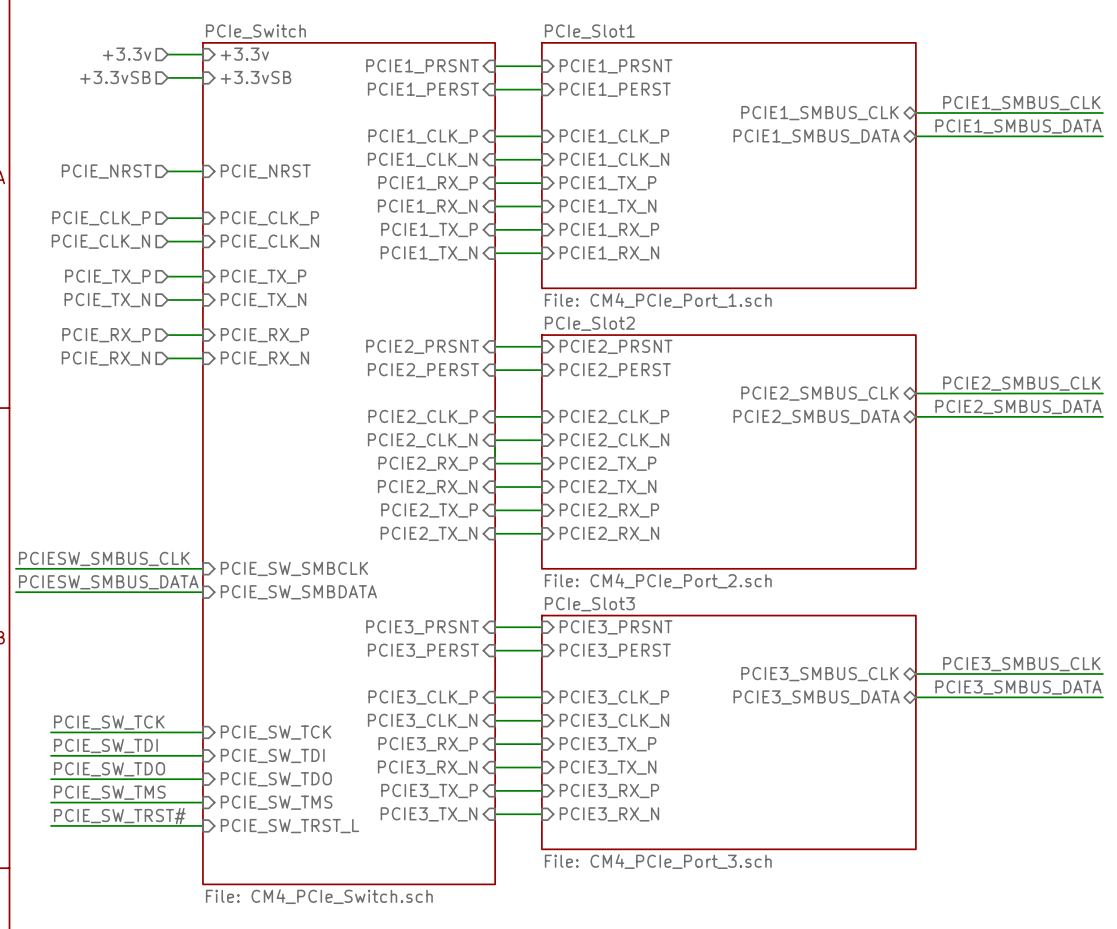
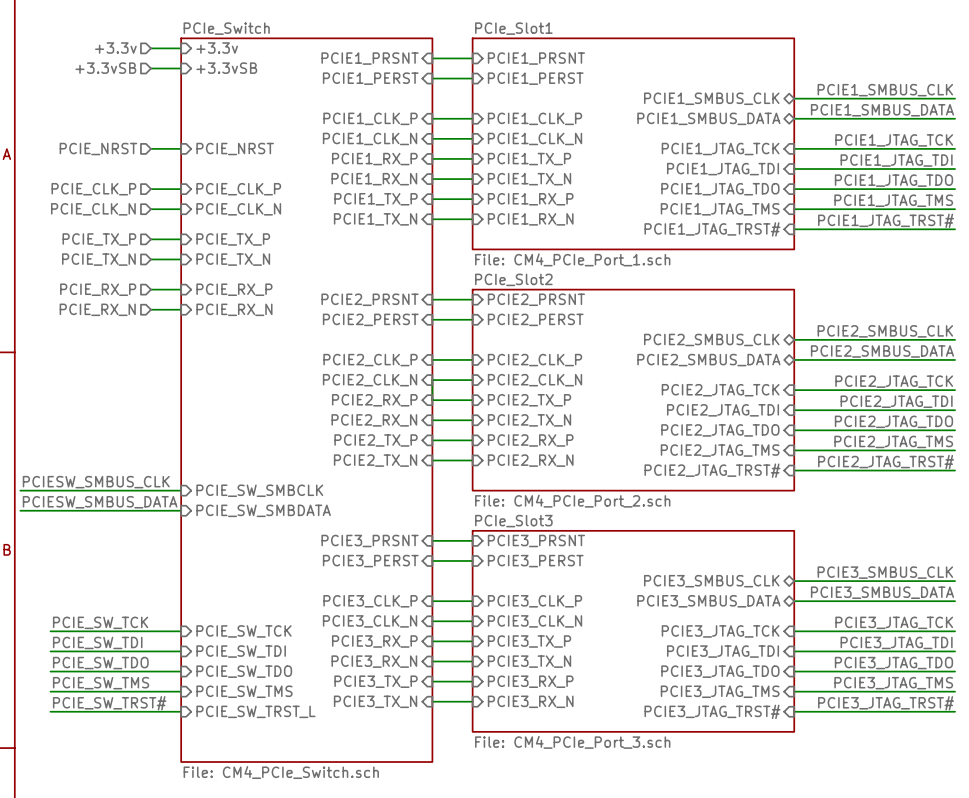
label: none -> PCIE1_JTAG_TCK (894, 140)
sheet pin: none -> PCIE1_JTAG_TCK (720, 149)
wire: none -> (794, 148) (955, 148)
label: none -> PCIE1_JTAG_TDI (896, 160)
sheet pin: none -> PCIE1_JTAG_TDI (723, 169)
wire: none -> (794, 169) (955, 169)
label: none -> PCIE1_JTAG_TDO (893, 180)
sheet pin: none -> PCIE1_JTAG_TDO (720, 189)
wire: none -> (794, 189) (955, 189)
label: none -> PCIE1_JTAG_TMS (893, 200)
sheet pin: none -> PCIE1_JTAG_TMS (720, 209)
wire: none -> (794, 209) (955, 209)
label: none -> PCIE1_JTAG_TRST# (886, 220)
wire: none -> (794, 229) (955, 229)
sheet pin: none -> PCIE1_JTAG_TRST# (712, 229)
label: none -> PCIE2_JTAG_TCK (894, 381)
wire: none -> (794, 390) (955, 390)
sheet pin: none -> PCIE2_JTAG_TCK (720, 390)
label: none -> PCIE2_JTAG_TDI (896, 401)
sheet pin: none -> PCIE2_JTAG_TDI (723, 410)
wire: none -> (794, 410) (955, 410)
label: none -> PCIE2_JTAG_TDO (893, 421)
sheet pin: none -> PCIE2_JTAG_TDO (720, 430)
wire: none -> (794, 430) (955, 430)
label: none -> PCIE2_JTAG_TMS (893, 441)
sheet pin: none -> PCIE2_JTAG_TMS (720, 450)
wire: none -> (794, 450) (955, 450)
label: none -> PCIE2_JTAG_TRST# (886, 462)
sheet pin: none -> PCIE2_JTAG_TRST# (712, 470)
wire: none -> (794, 470) (955, 470)
label: none -> PCIE3_JTAG_TCK (894, 622)
sheet pin: none -> PCIE3_JTAG_TCK (720, 631)
wire: none -> (794, 631) (955, 631)
label: none -> PCIE3_JTAG_TDI (896, 642)
sheet pin: none -> PCIE3_JTAG_TDI (723, 651)
wire: none -> (794, 651) (955, 651)
label: none -> PCIE3_JTAG_TDO (893, 663)
sheet pin: none -> PCIE3_JTAG_TDO (720, 671)
wire: none -> (794, 671) (955, 671)
label: none -> PCIE3_JTAG_TMS (893, 683)
sheet pin: none -> PCIE3_JTAG_TMS (720, 691)
wire: none -> (794, 691) (955, 691)
label: none -> PCIE3_JTAG_TRST# (886, 703)
wire: none -> (794, 711) (955, 711)
sheet pin: none -> PCIE3_JTAG_TRST# (712, 711)

